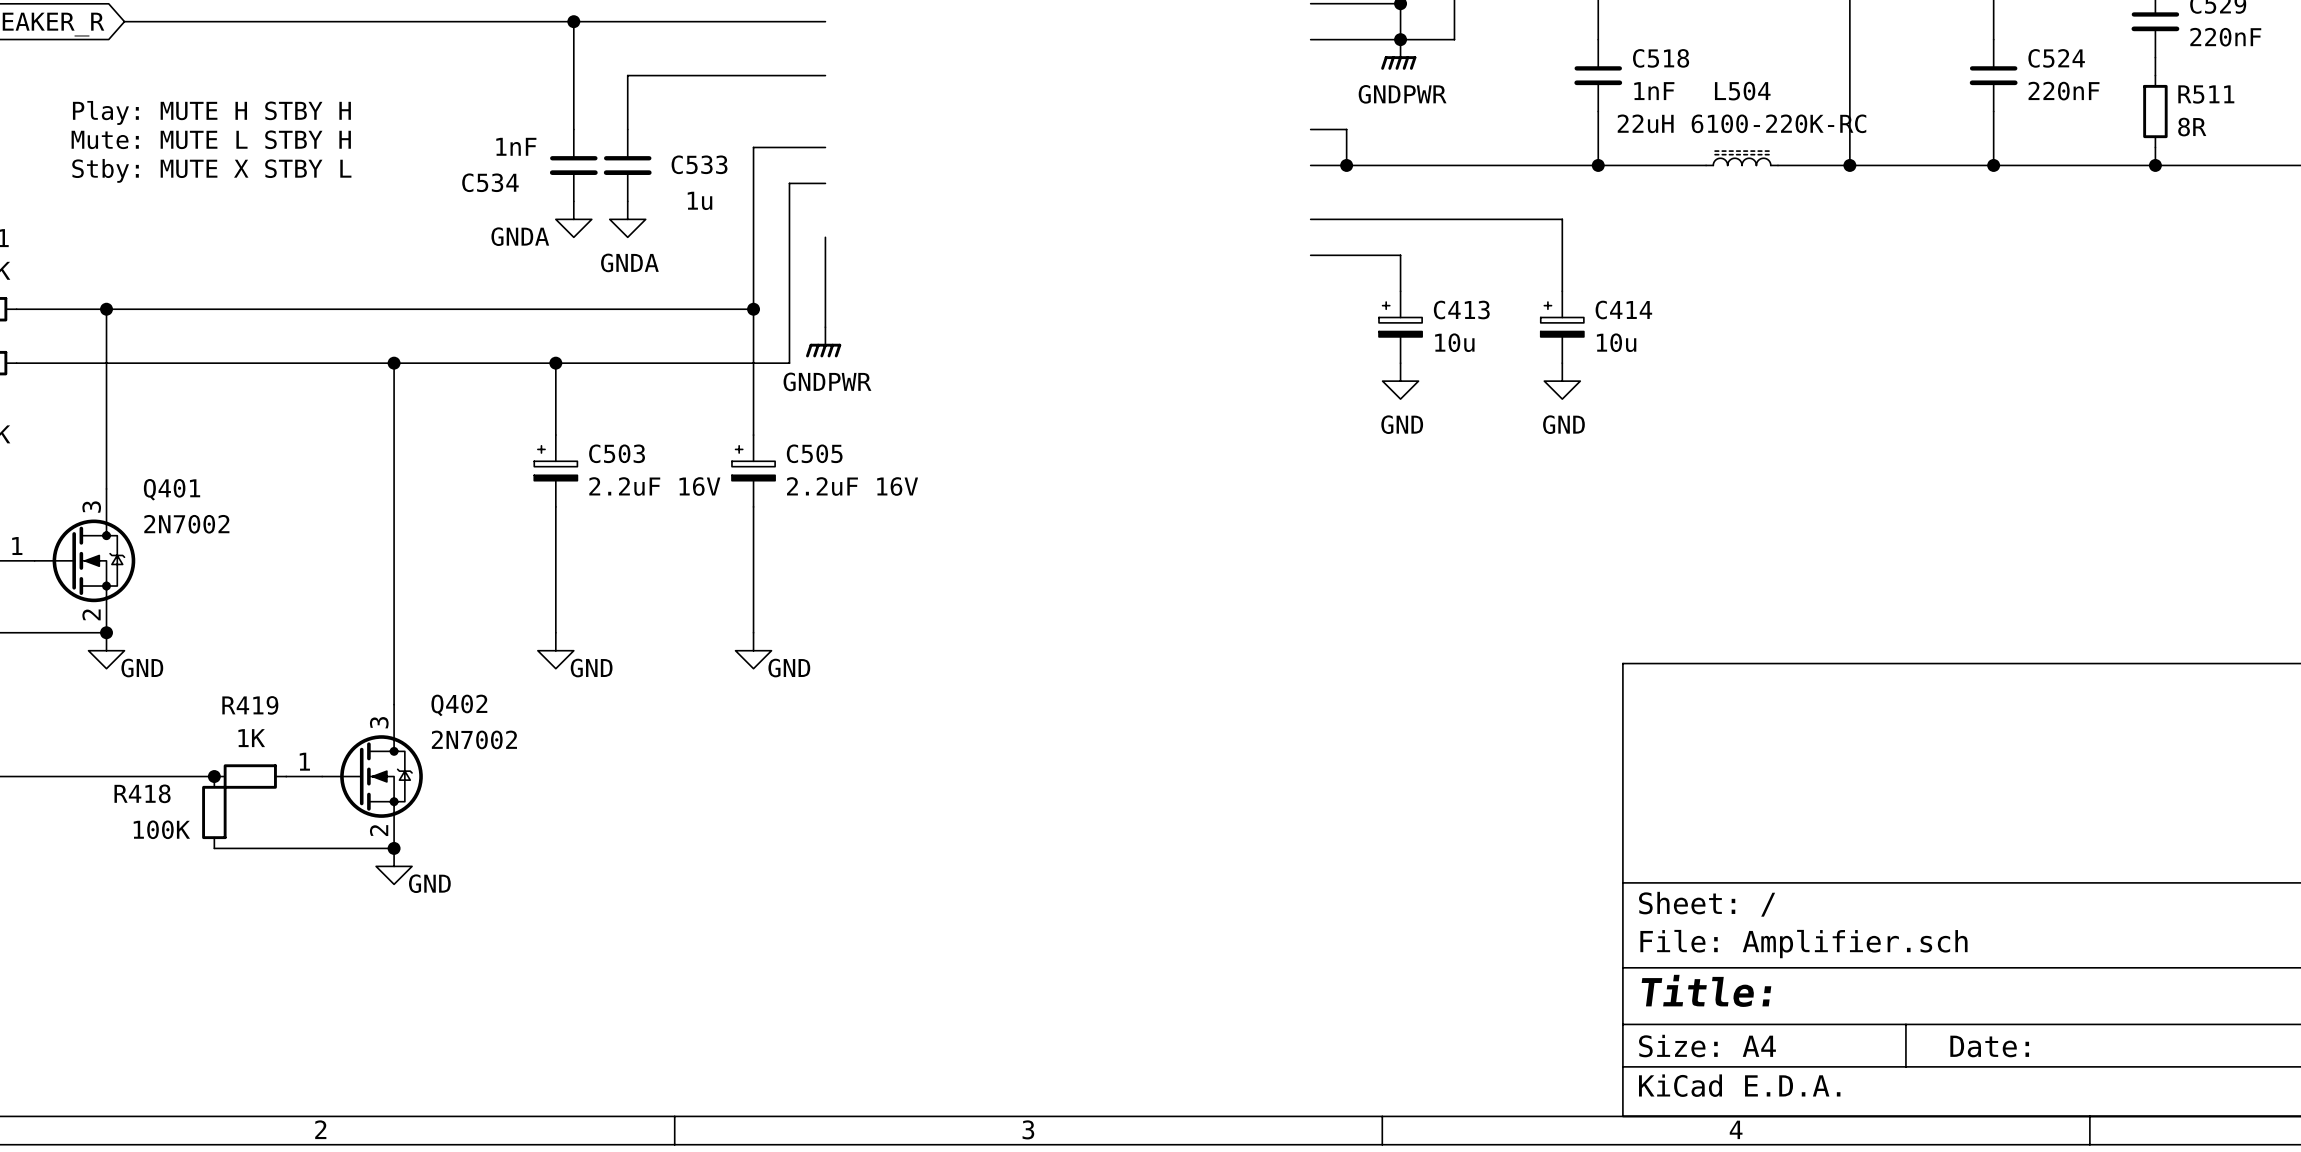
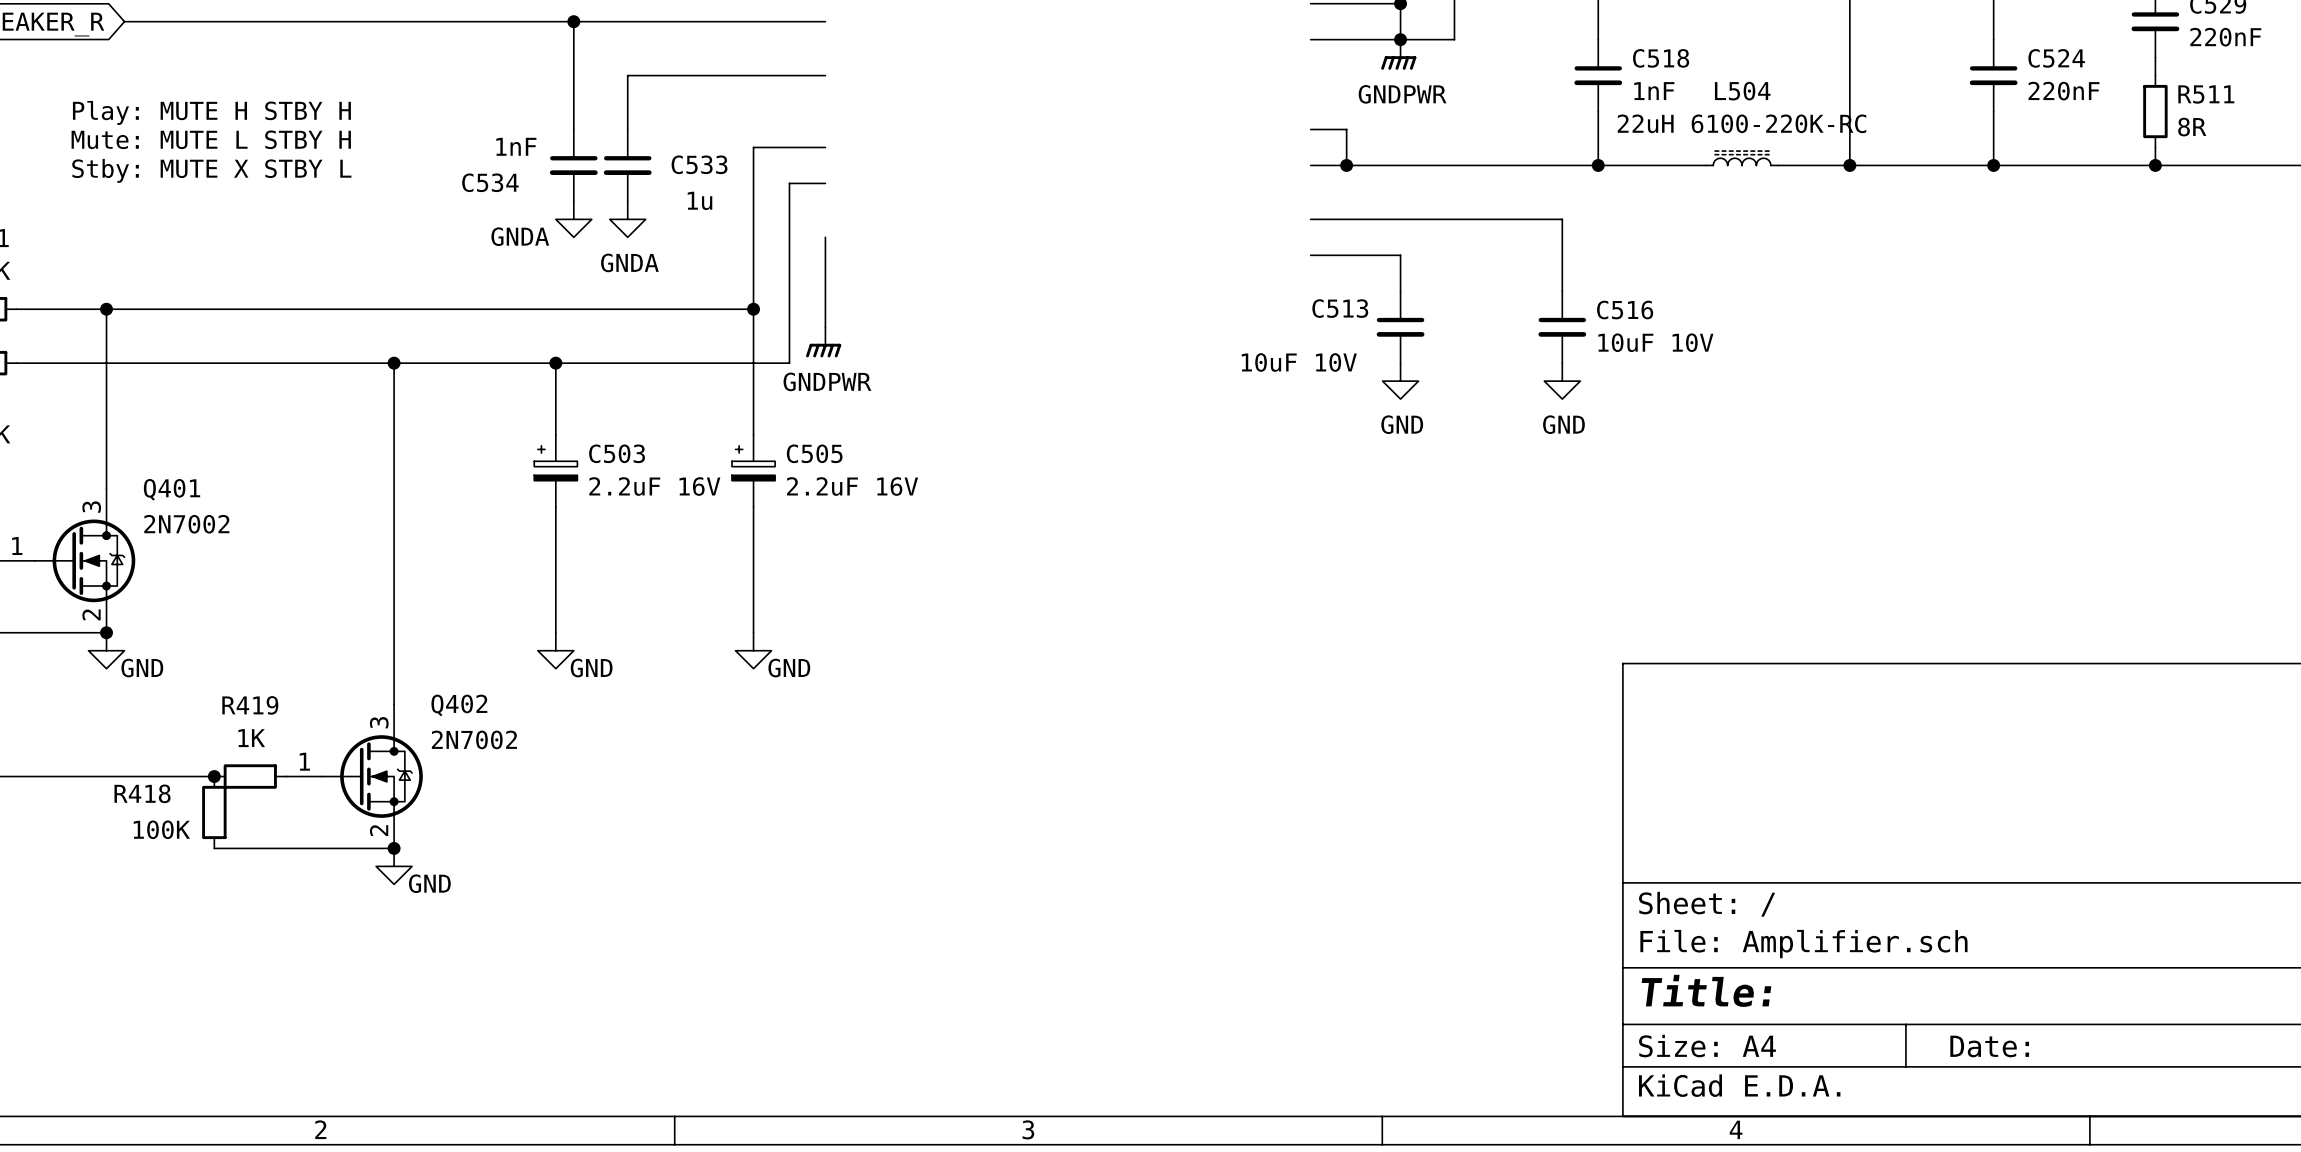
C413: 10u (1400, 327) -> none
C513: none -> 10uF 10V (1400, 327)
C414: 10u (1562, 327) -> none
C516: none -> 10uF 10V (1562, 327)

